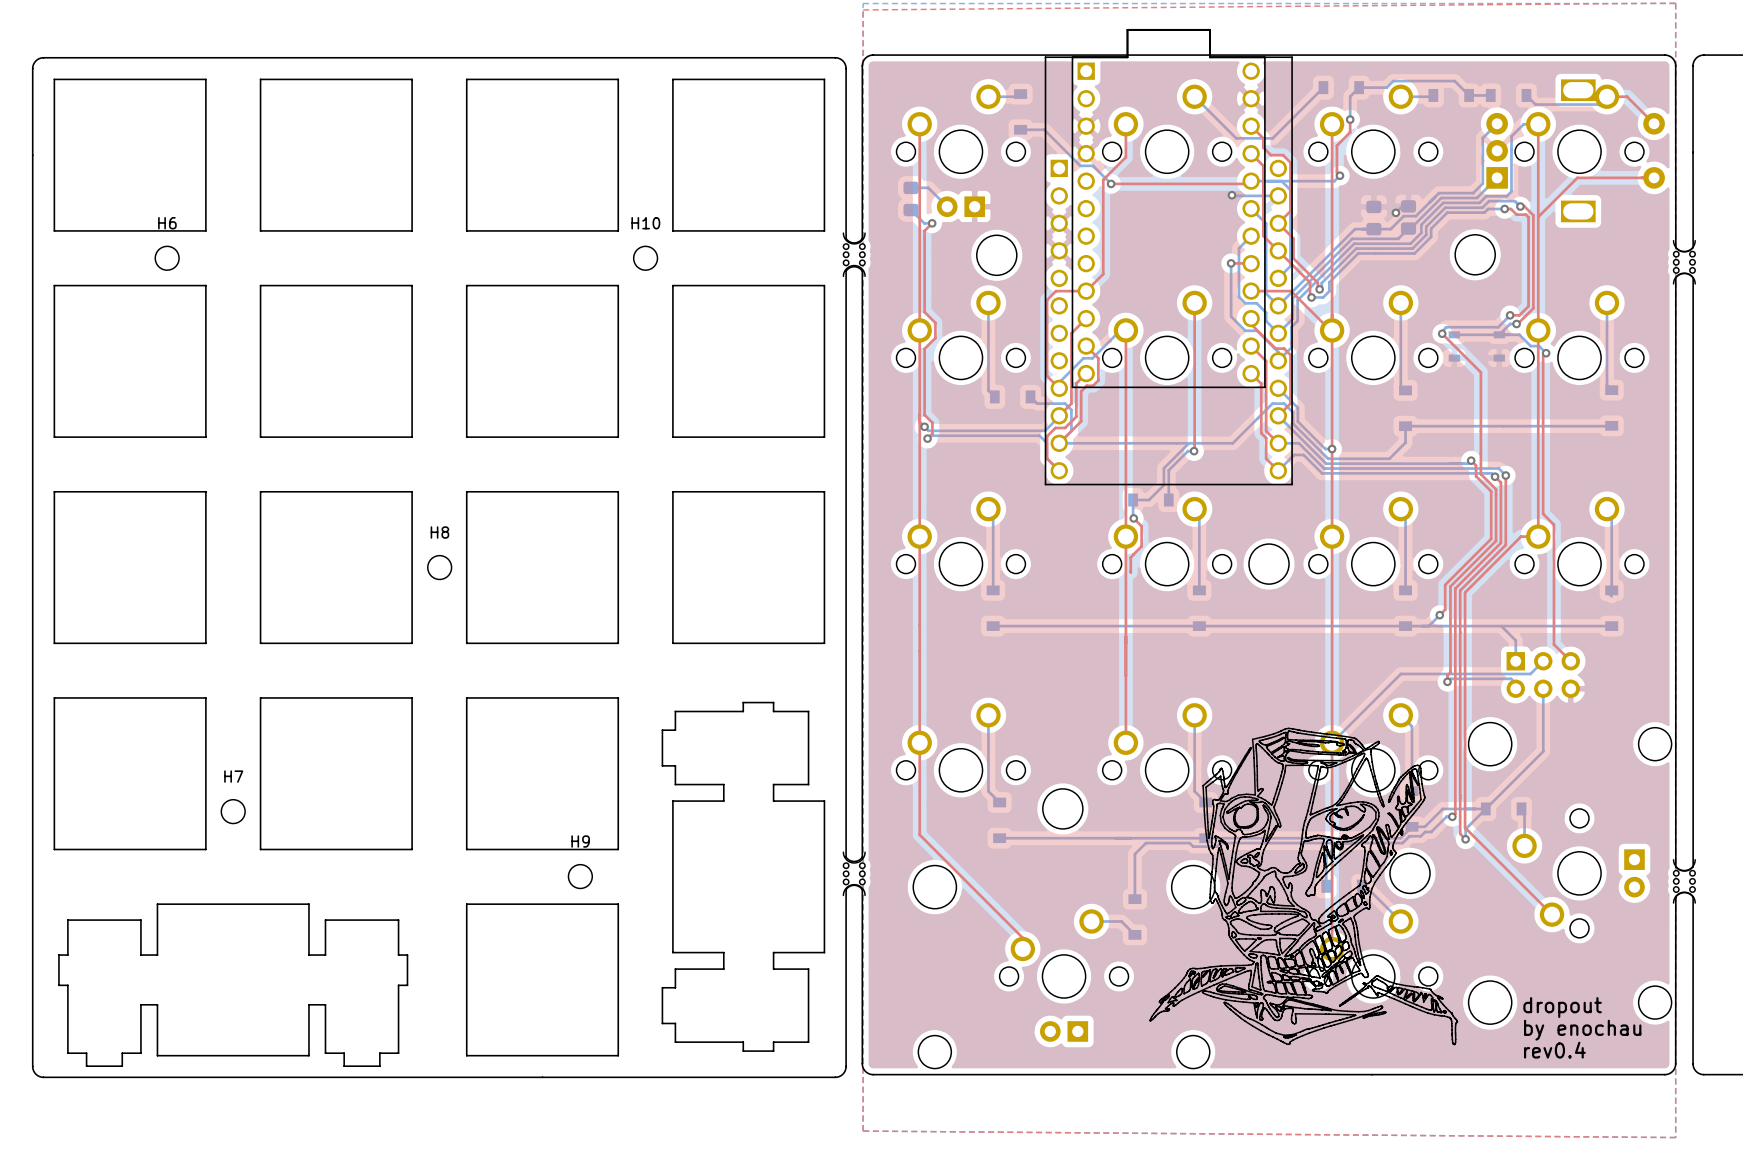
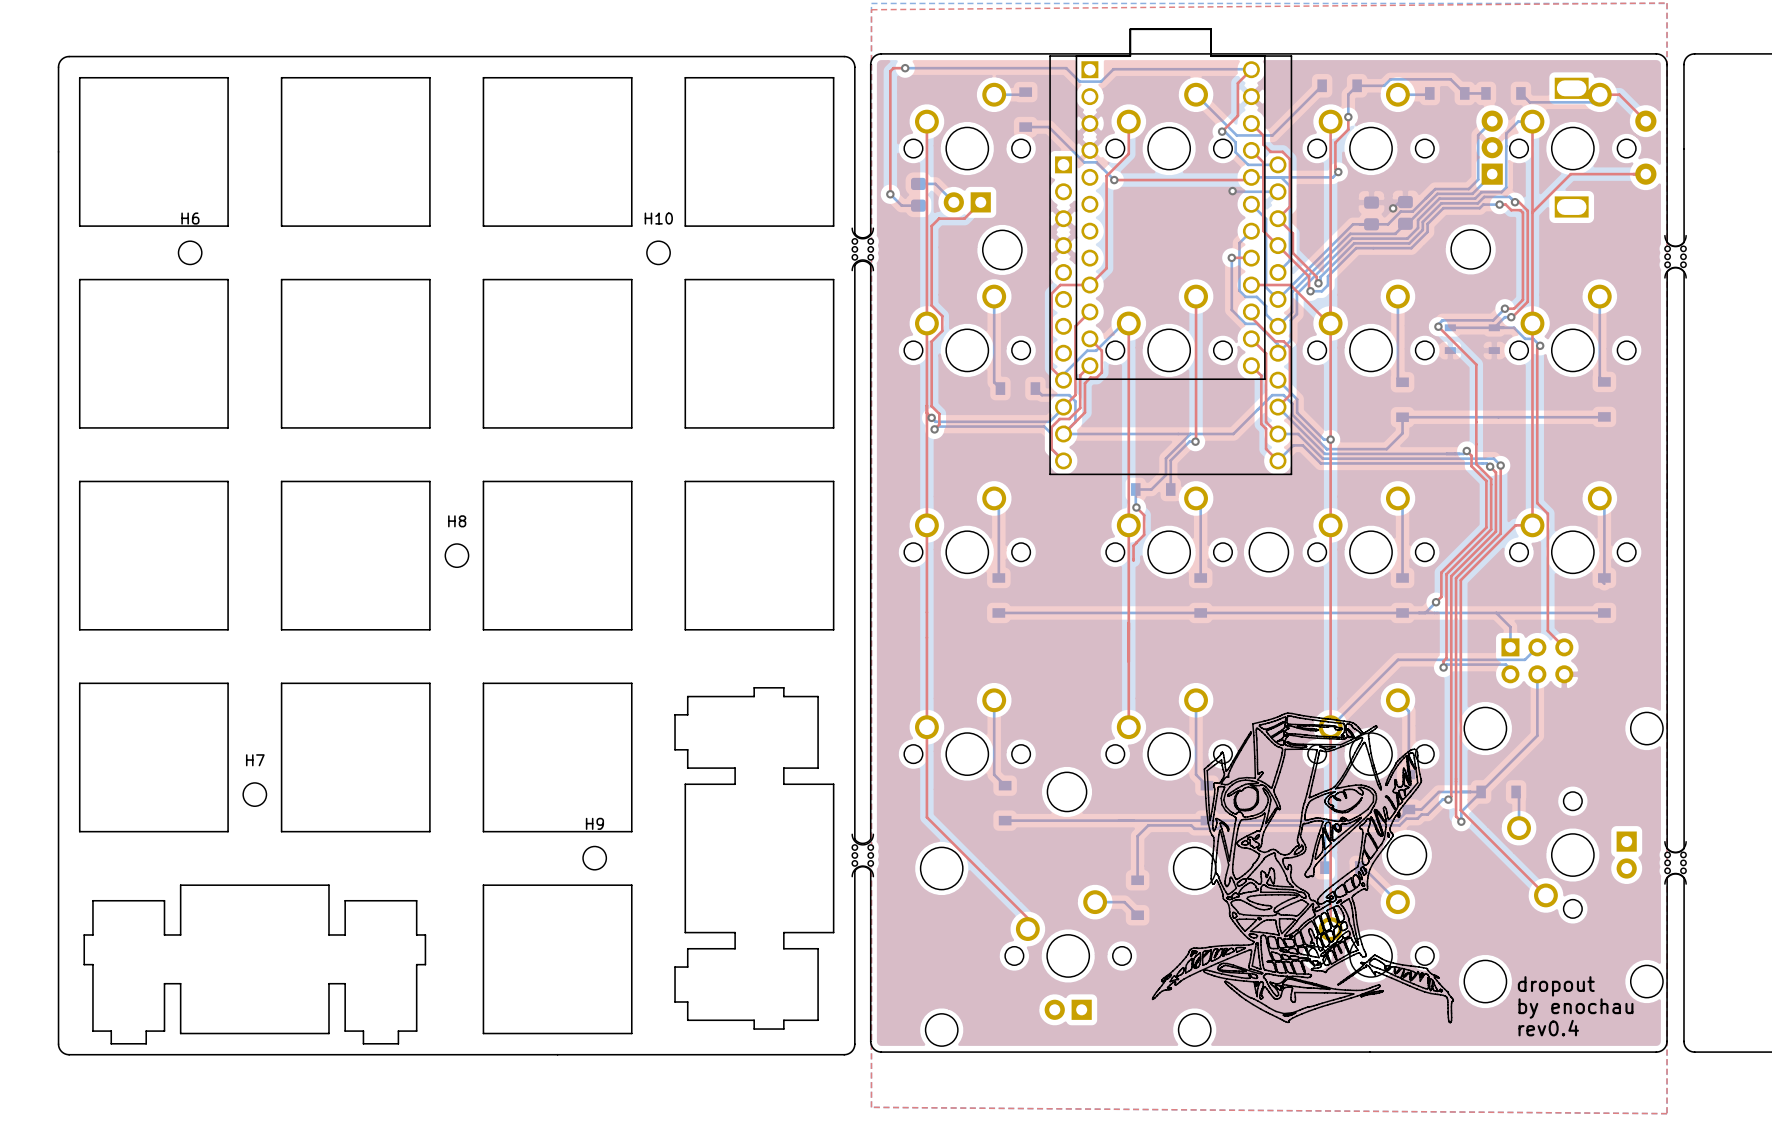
bottom track: none -> (905, 68) (1066, 68) (1079, 81) (1101, 81) (1113, 69) (1251, 69)
top track: none -> (905, 68) (893, 68) (890, 71) (890, 194)
via: none -> (905, 68)
top track: none -> (1251, 69) (1237, 83) (1237, 115) (1222, 131)
bottom track: none -> (1222, 131) (1224, 131) (1235, 142) (1235, 152) (1248, 164) (1277, 164)
via: none -> (1222, 131)
top track: none -> (980, 202) (964, 218) (939, 218)
bottom track: (911, 210) (924, 223) (932, 223) -> (918, 205) (901, 205) (890, 194)
via position: (932, 223) -> (890, 194)

